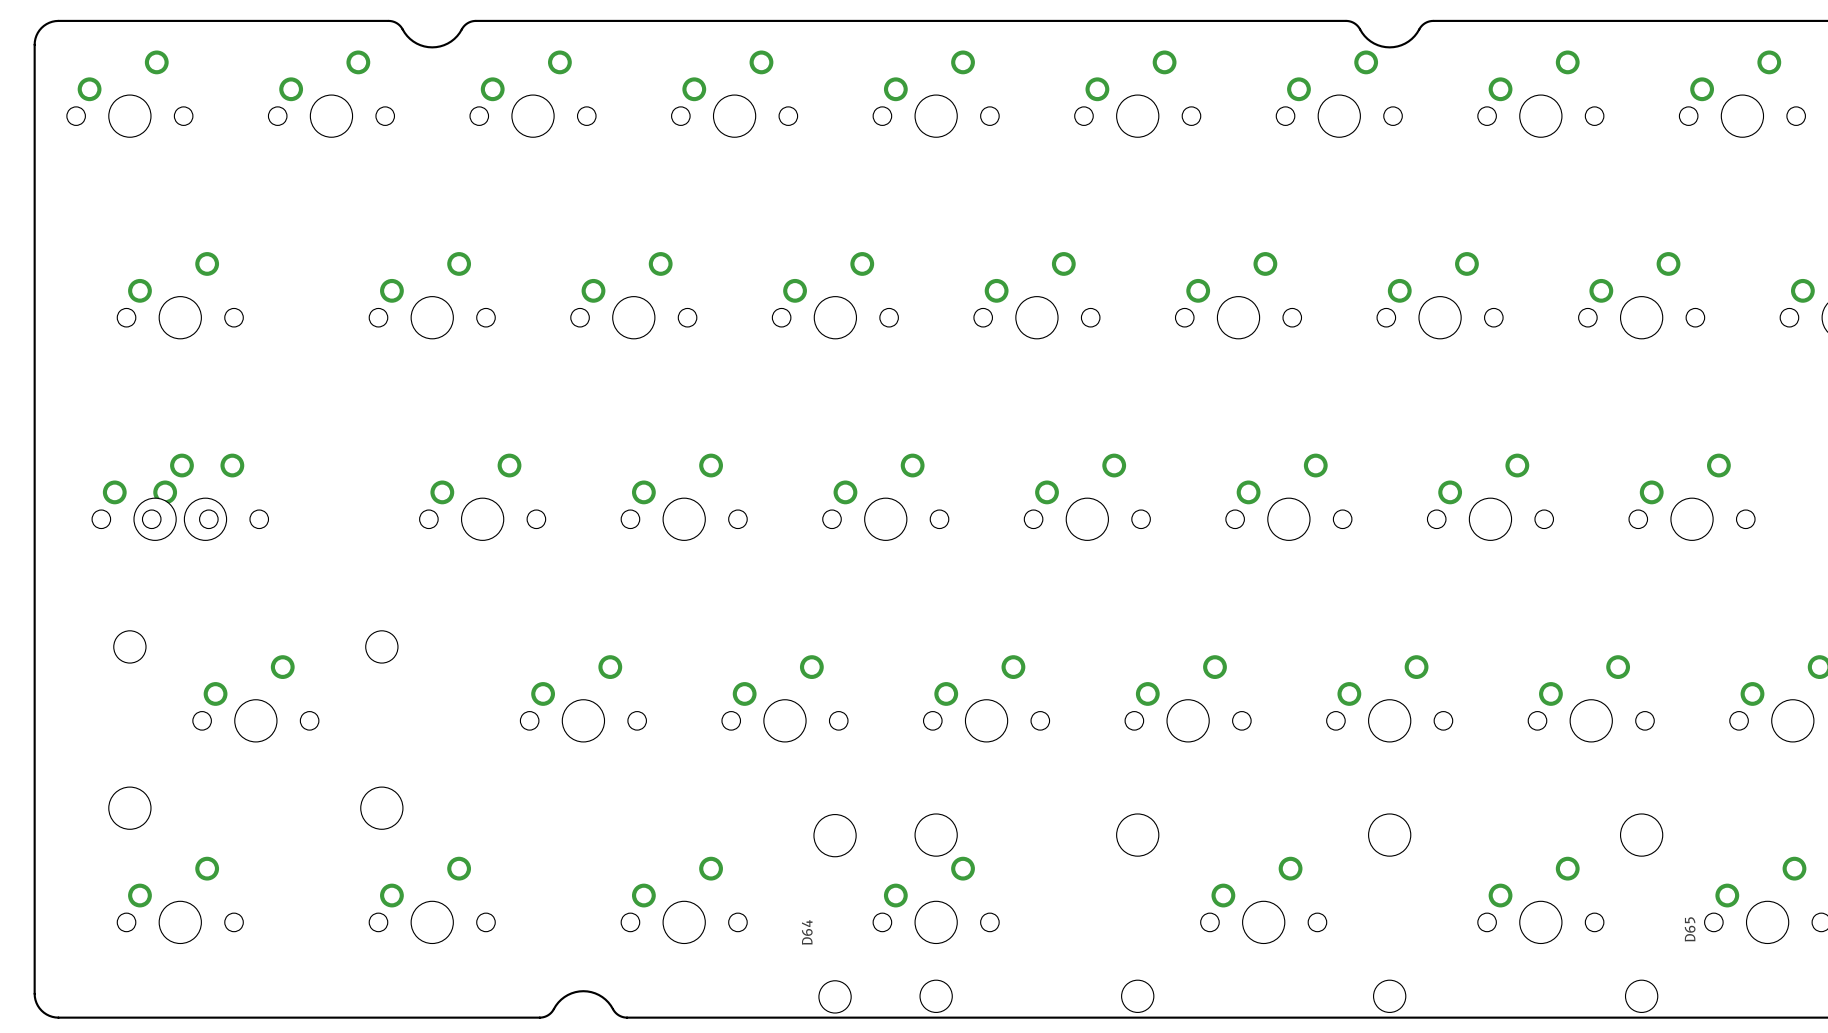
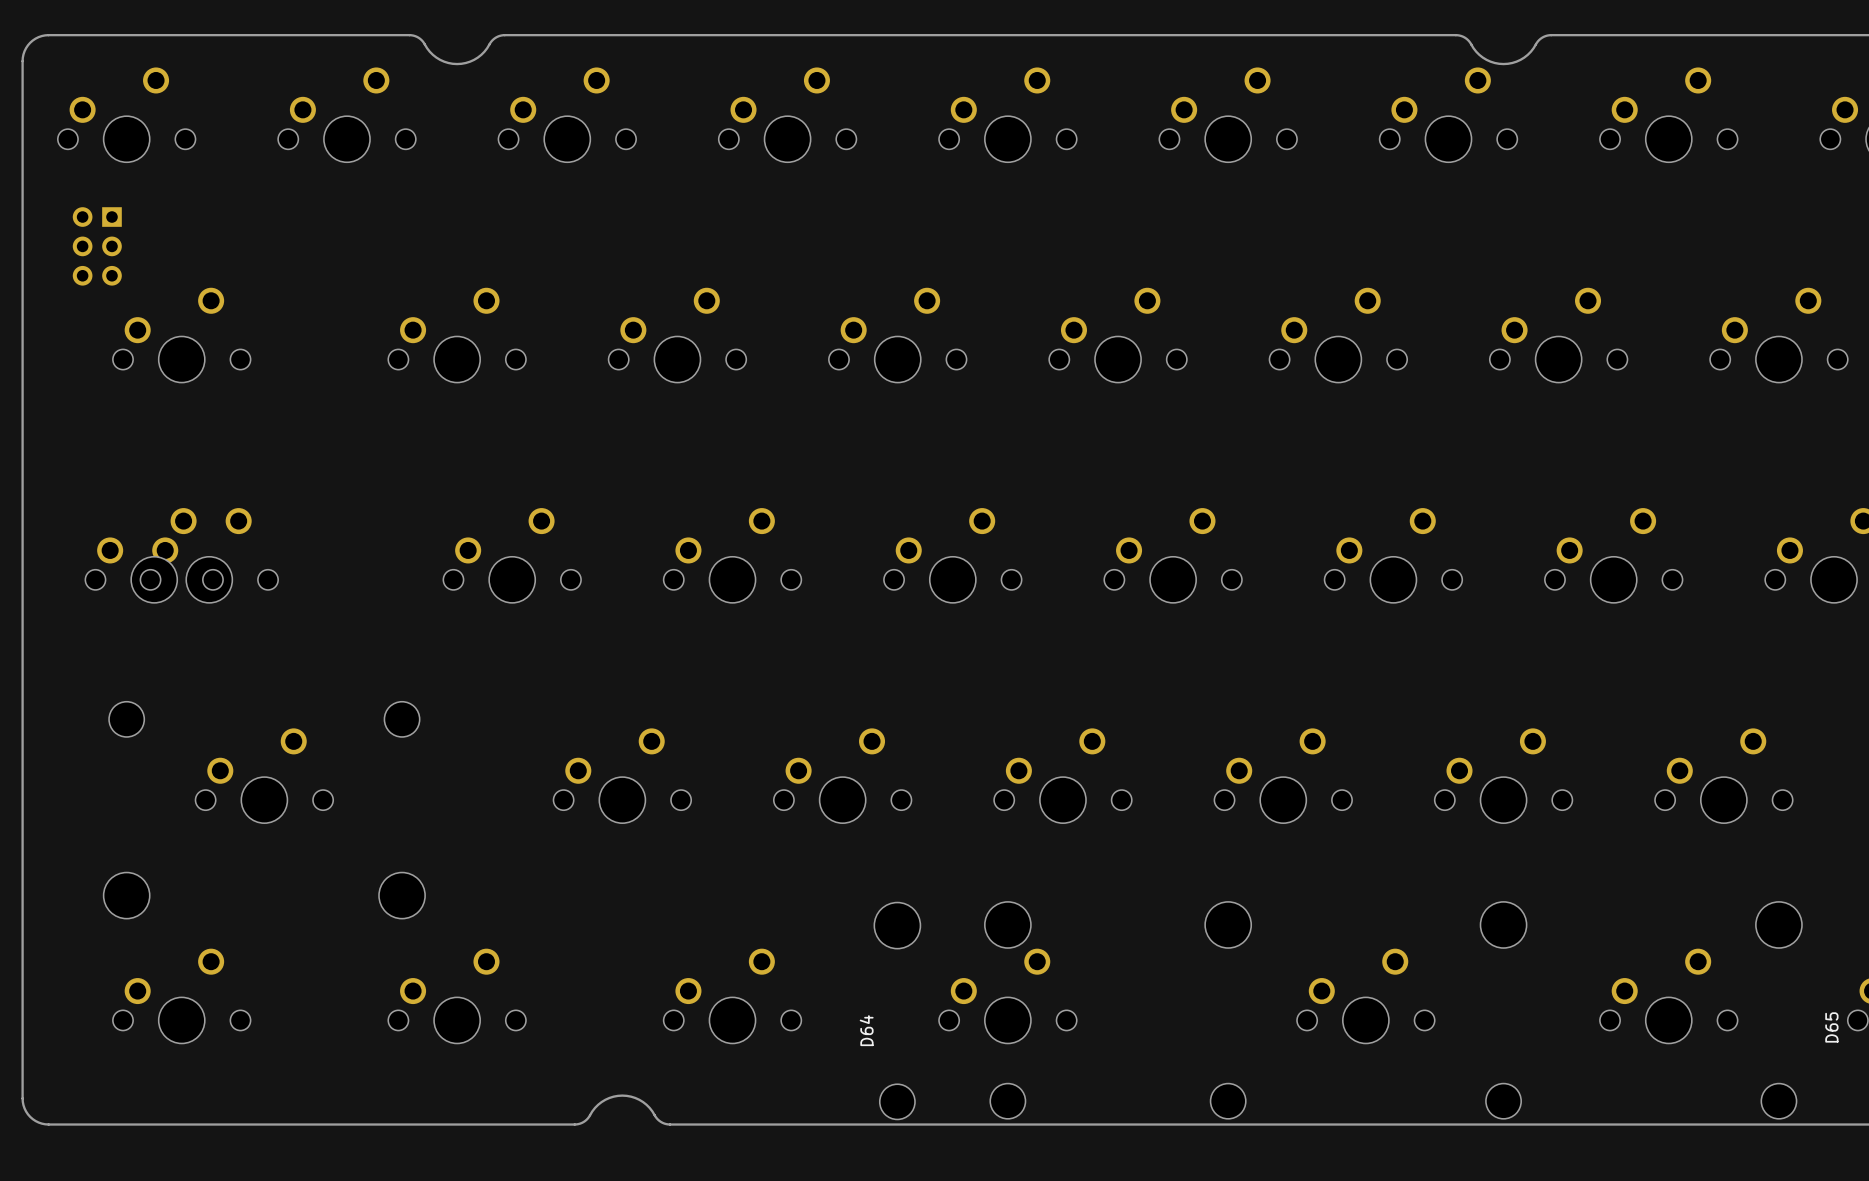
part: none -> (97, 246)

